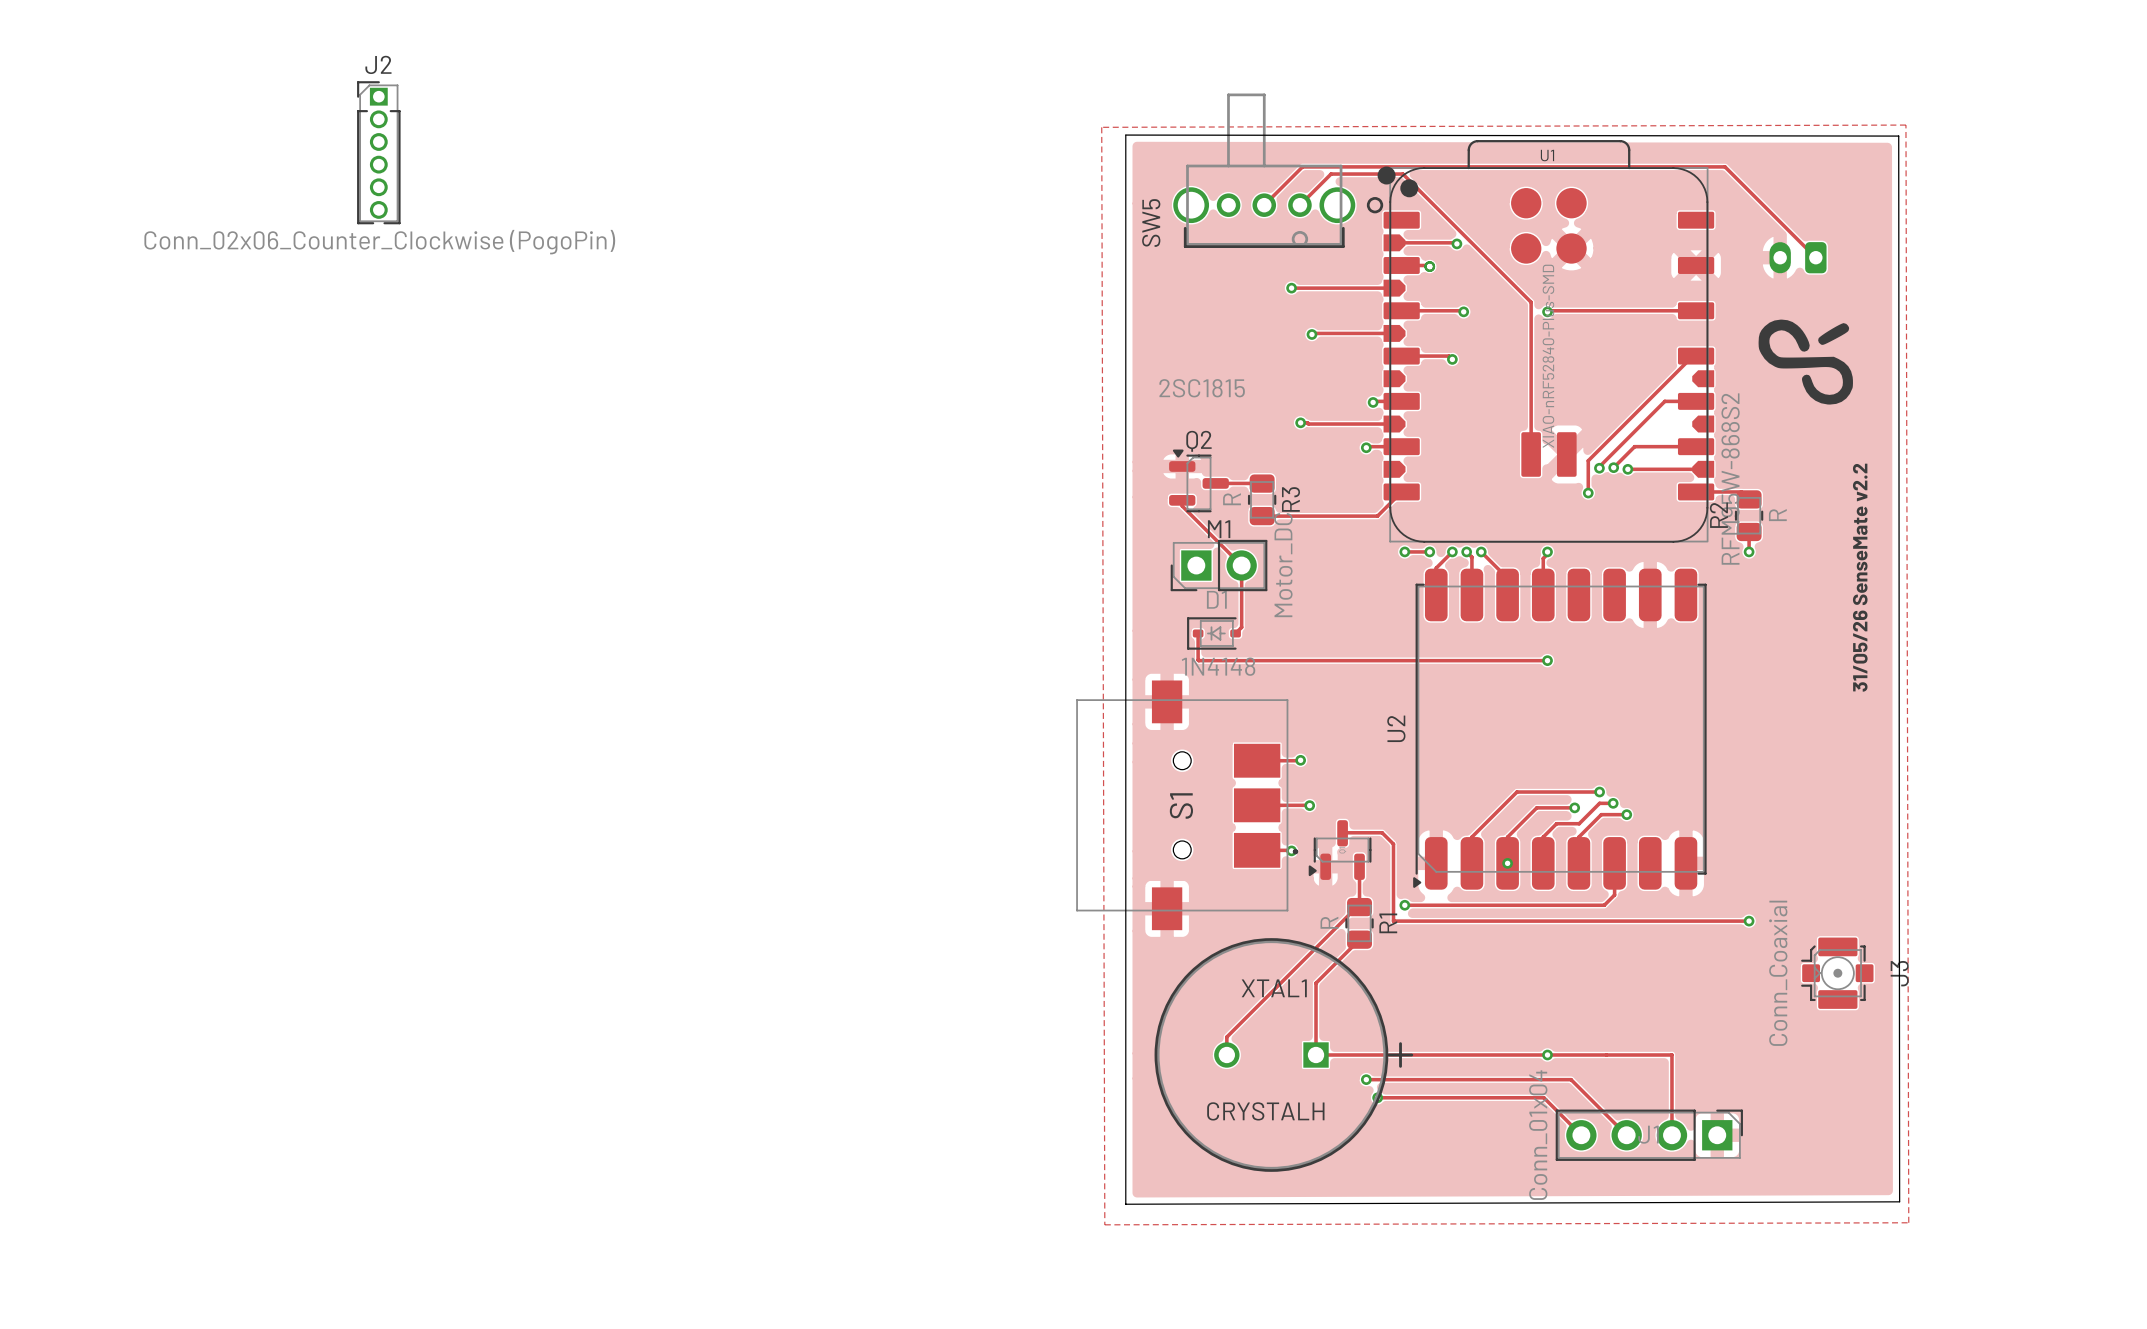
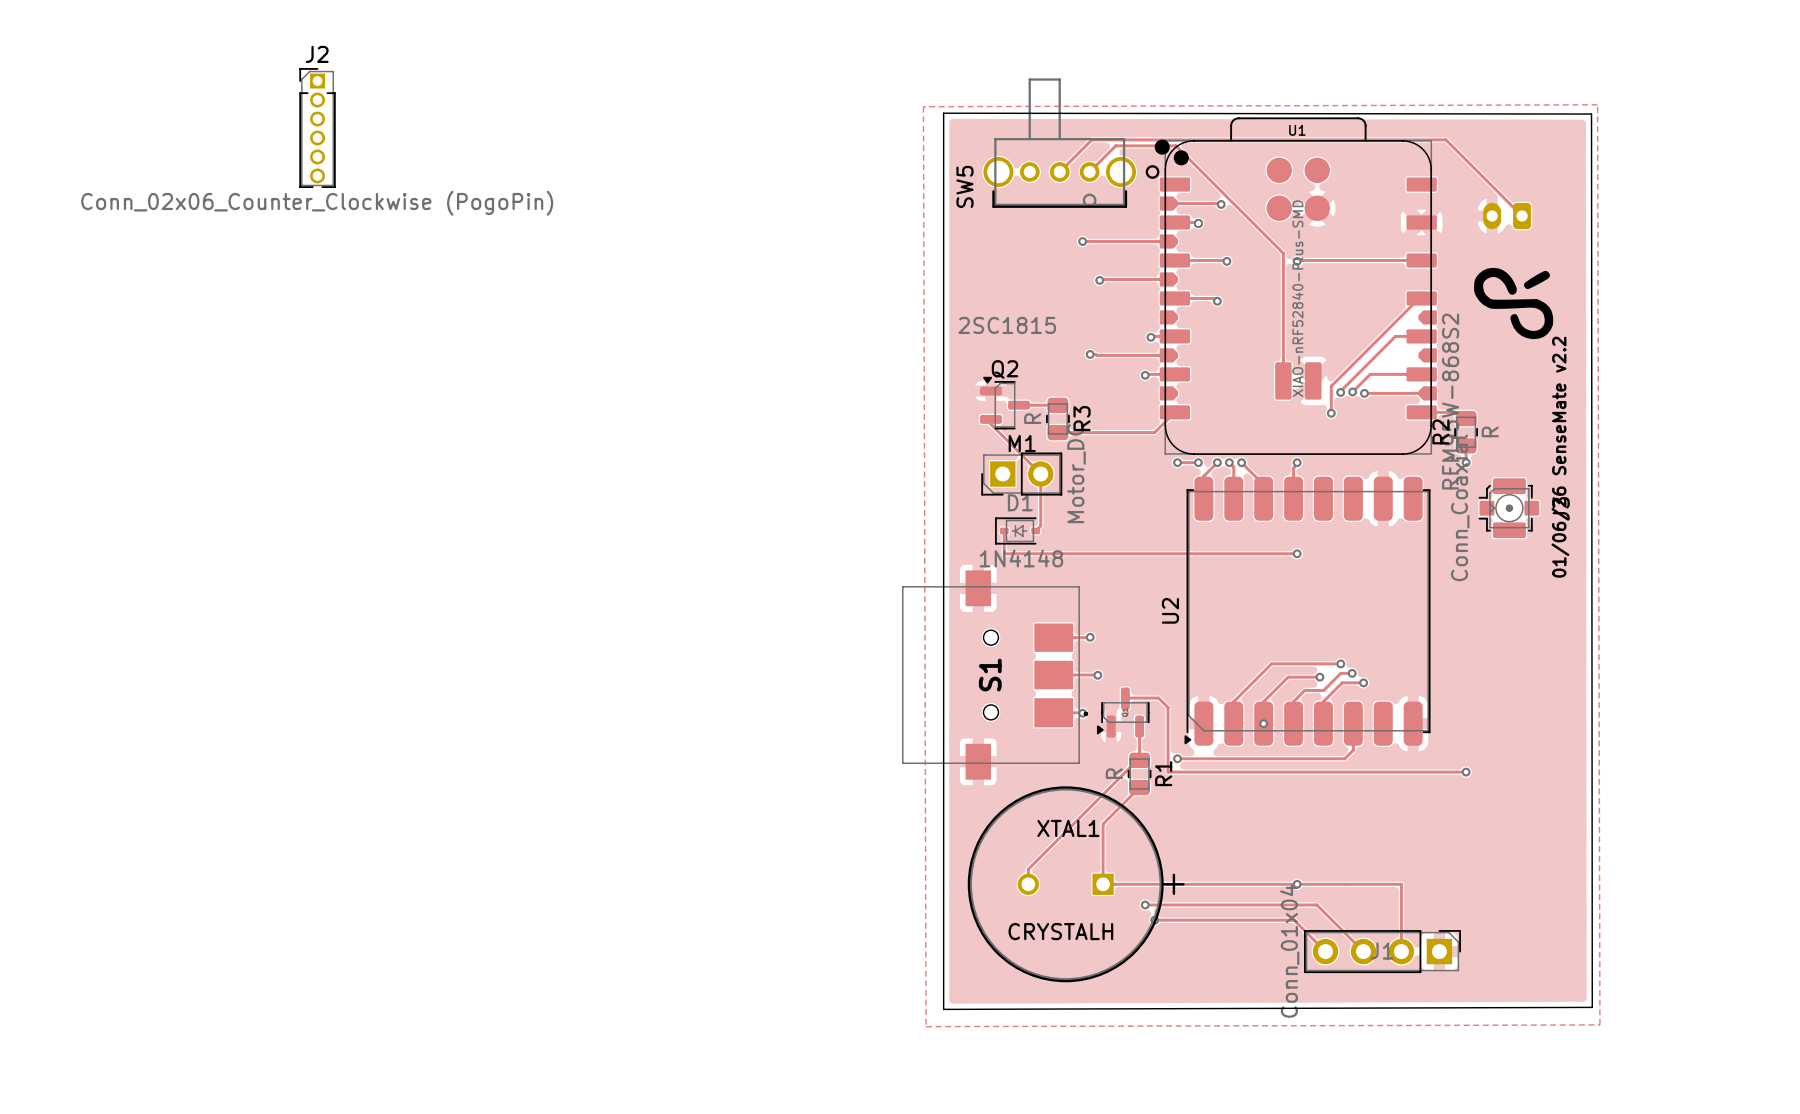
text: 31/05/26 SenseMate v2.2 (1860, 577) -> 01/06/26 SenseMate v2.2 (1560, 457)
J3 position: (1837, 973) -> (1508, 508)

